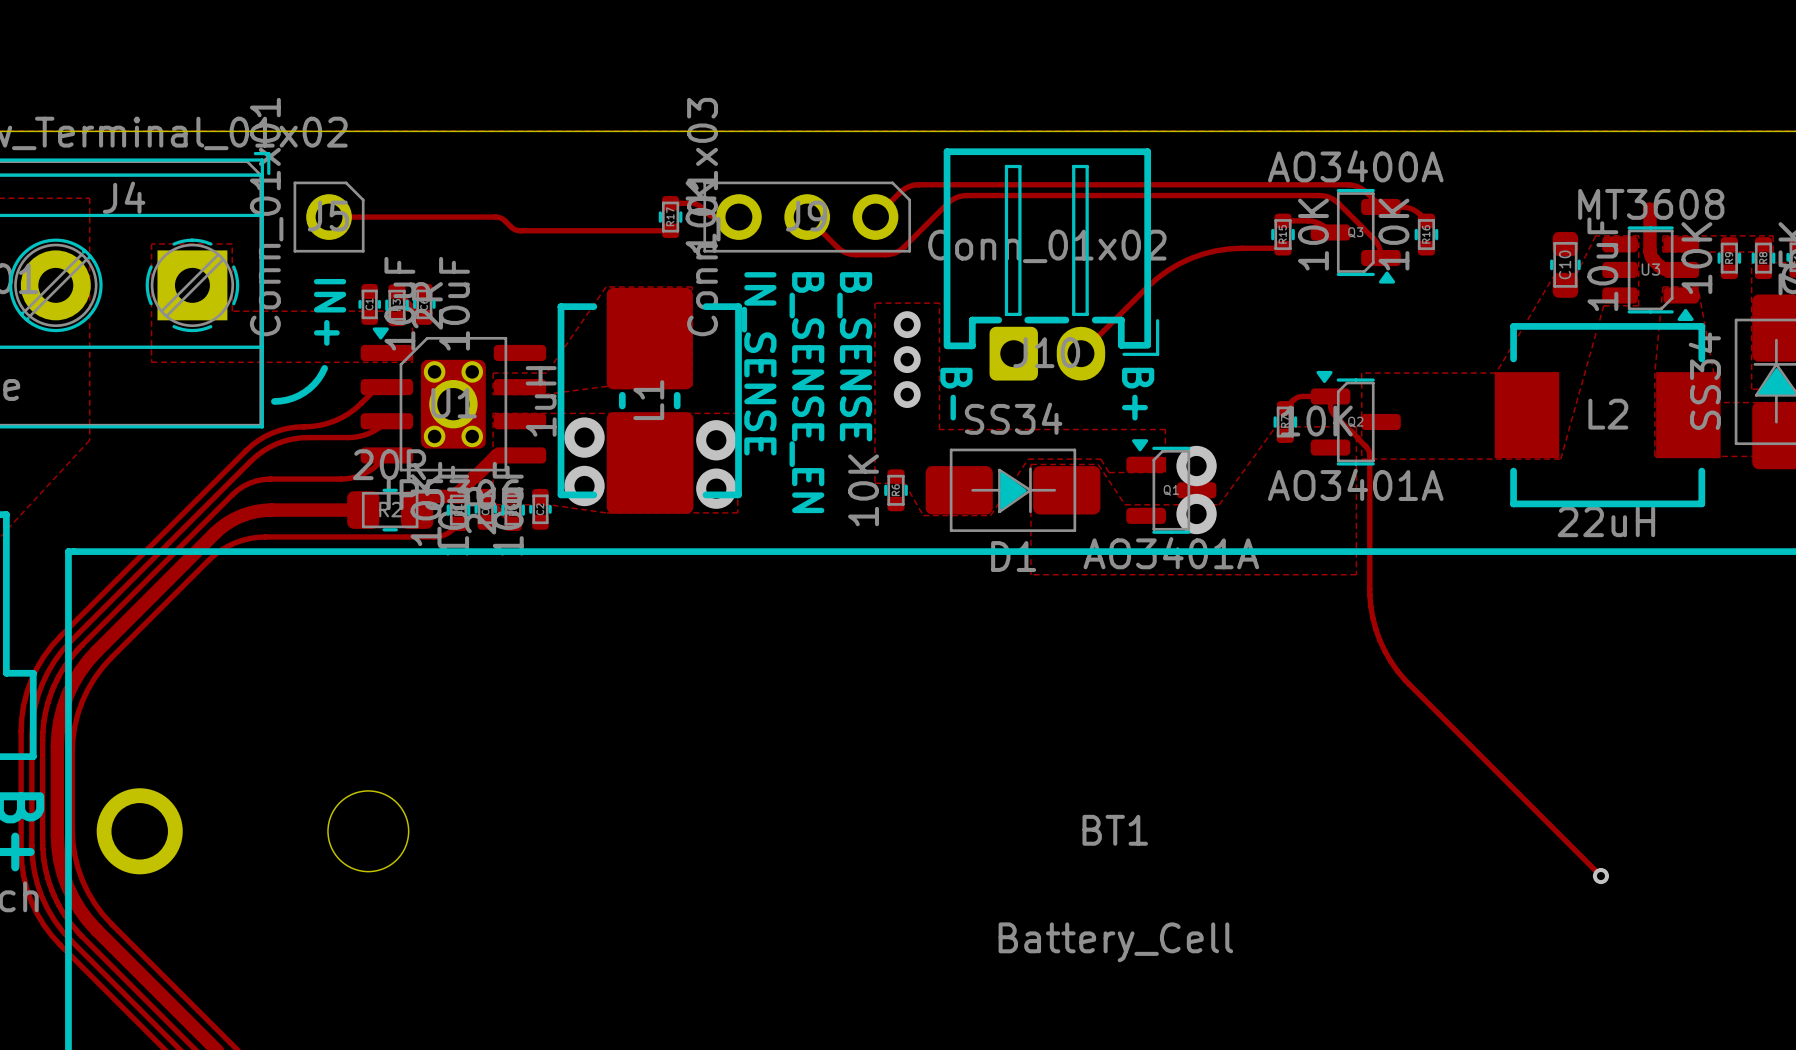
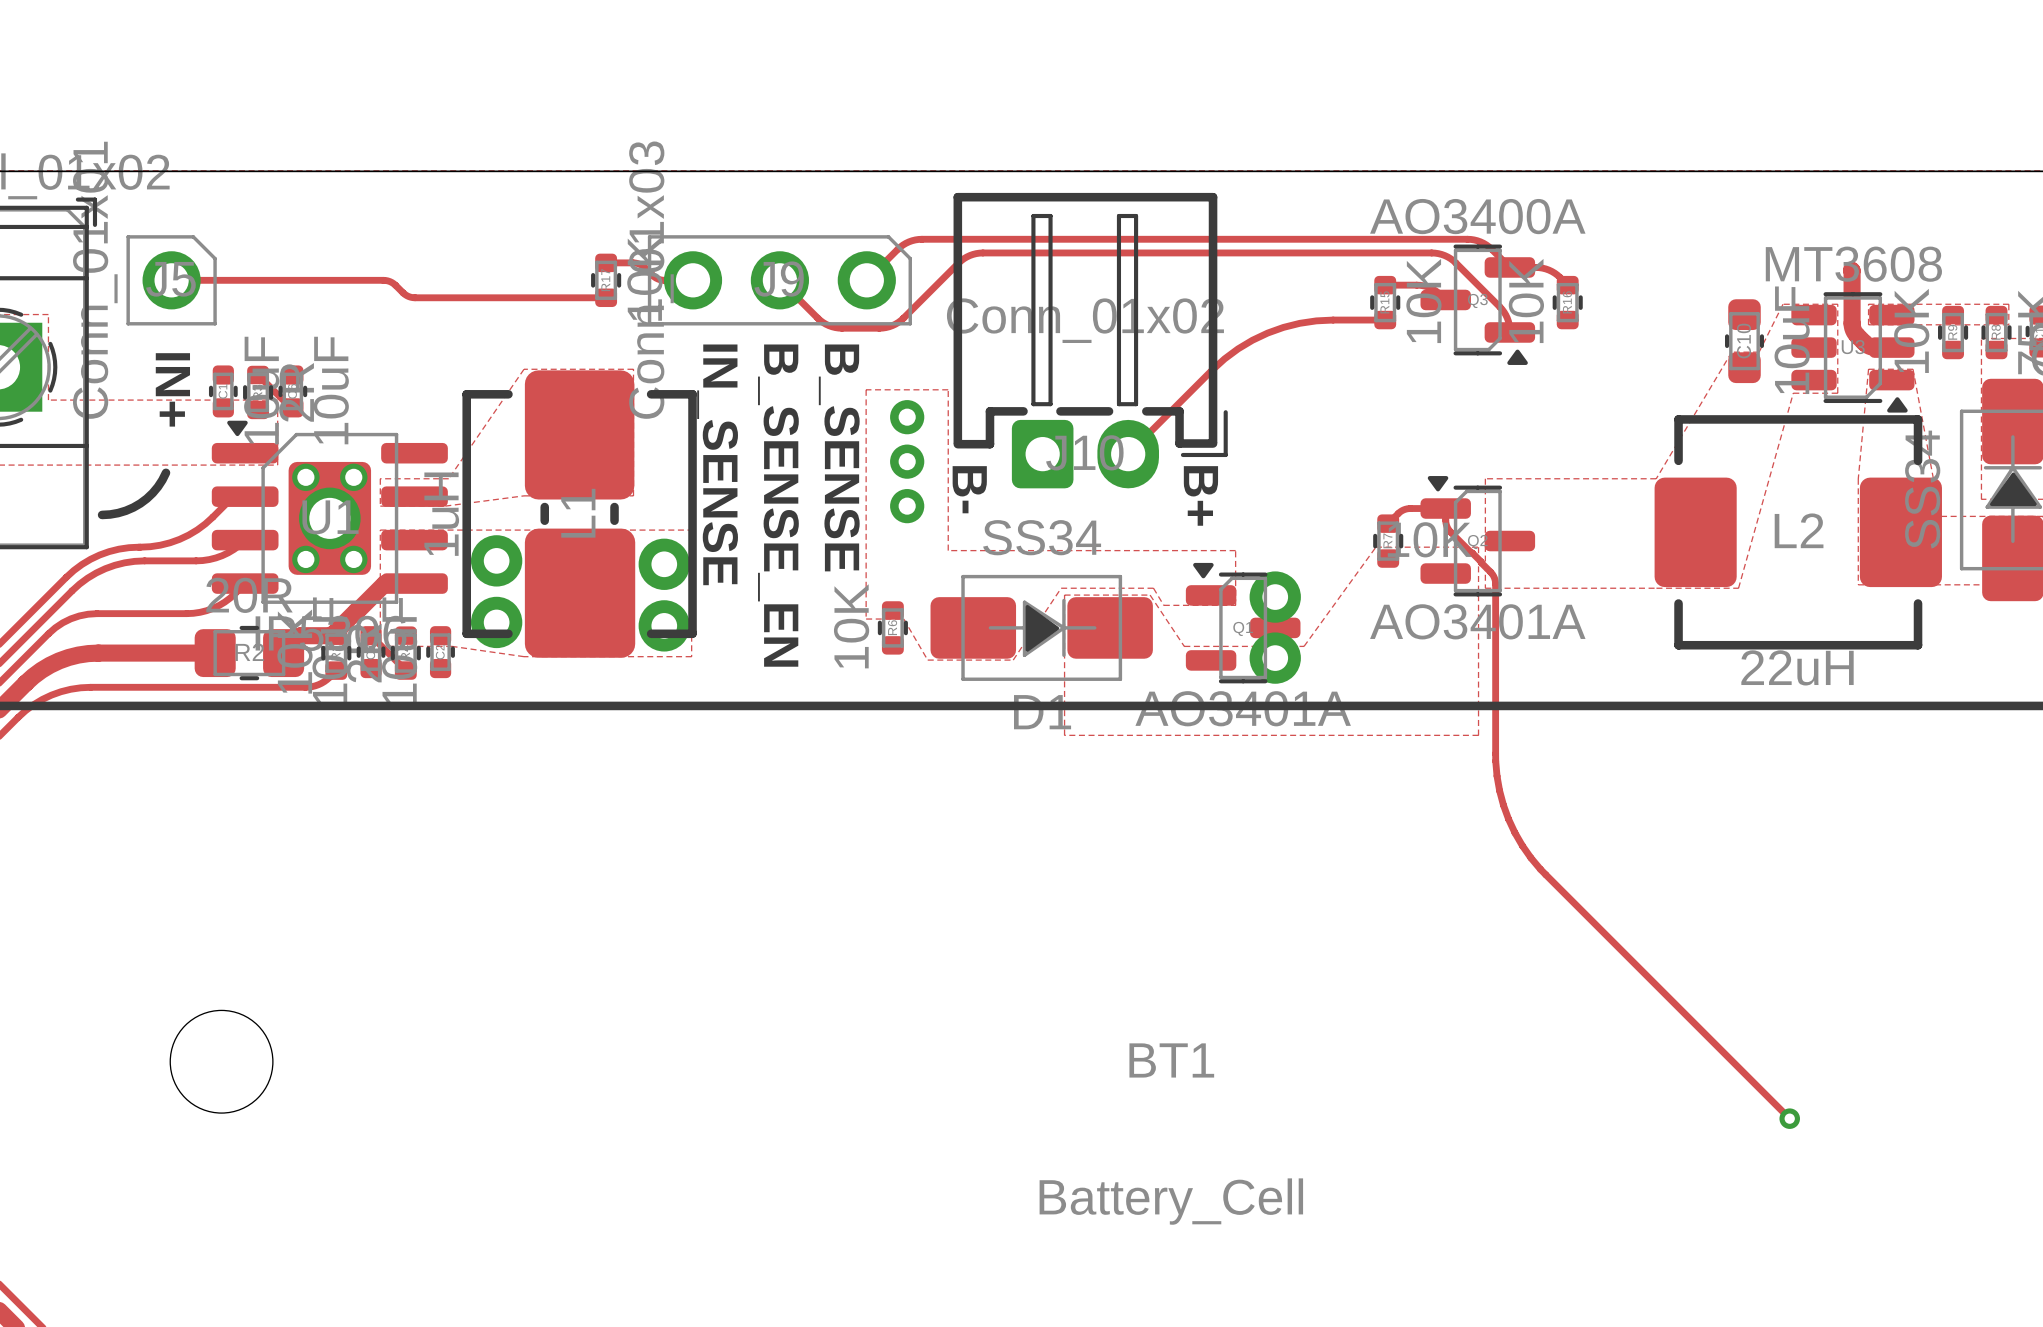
L1 footprint: [557, 287, 742, 514] -> [462, 370, 697, 658]
L2 footprint: [1494, 323, 1721, 508] -> [1654, 415, 1942, 650]

